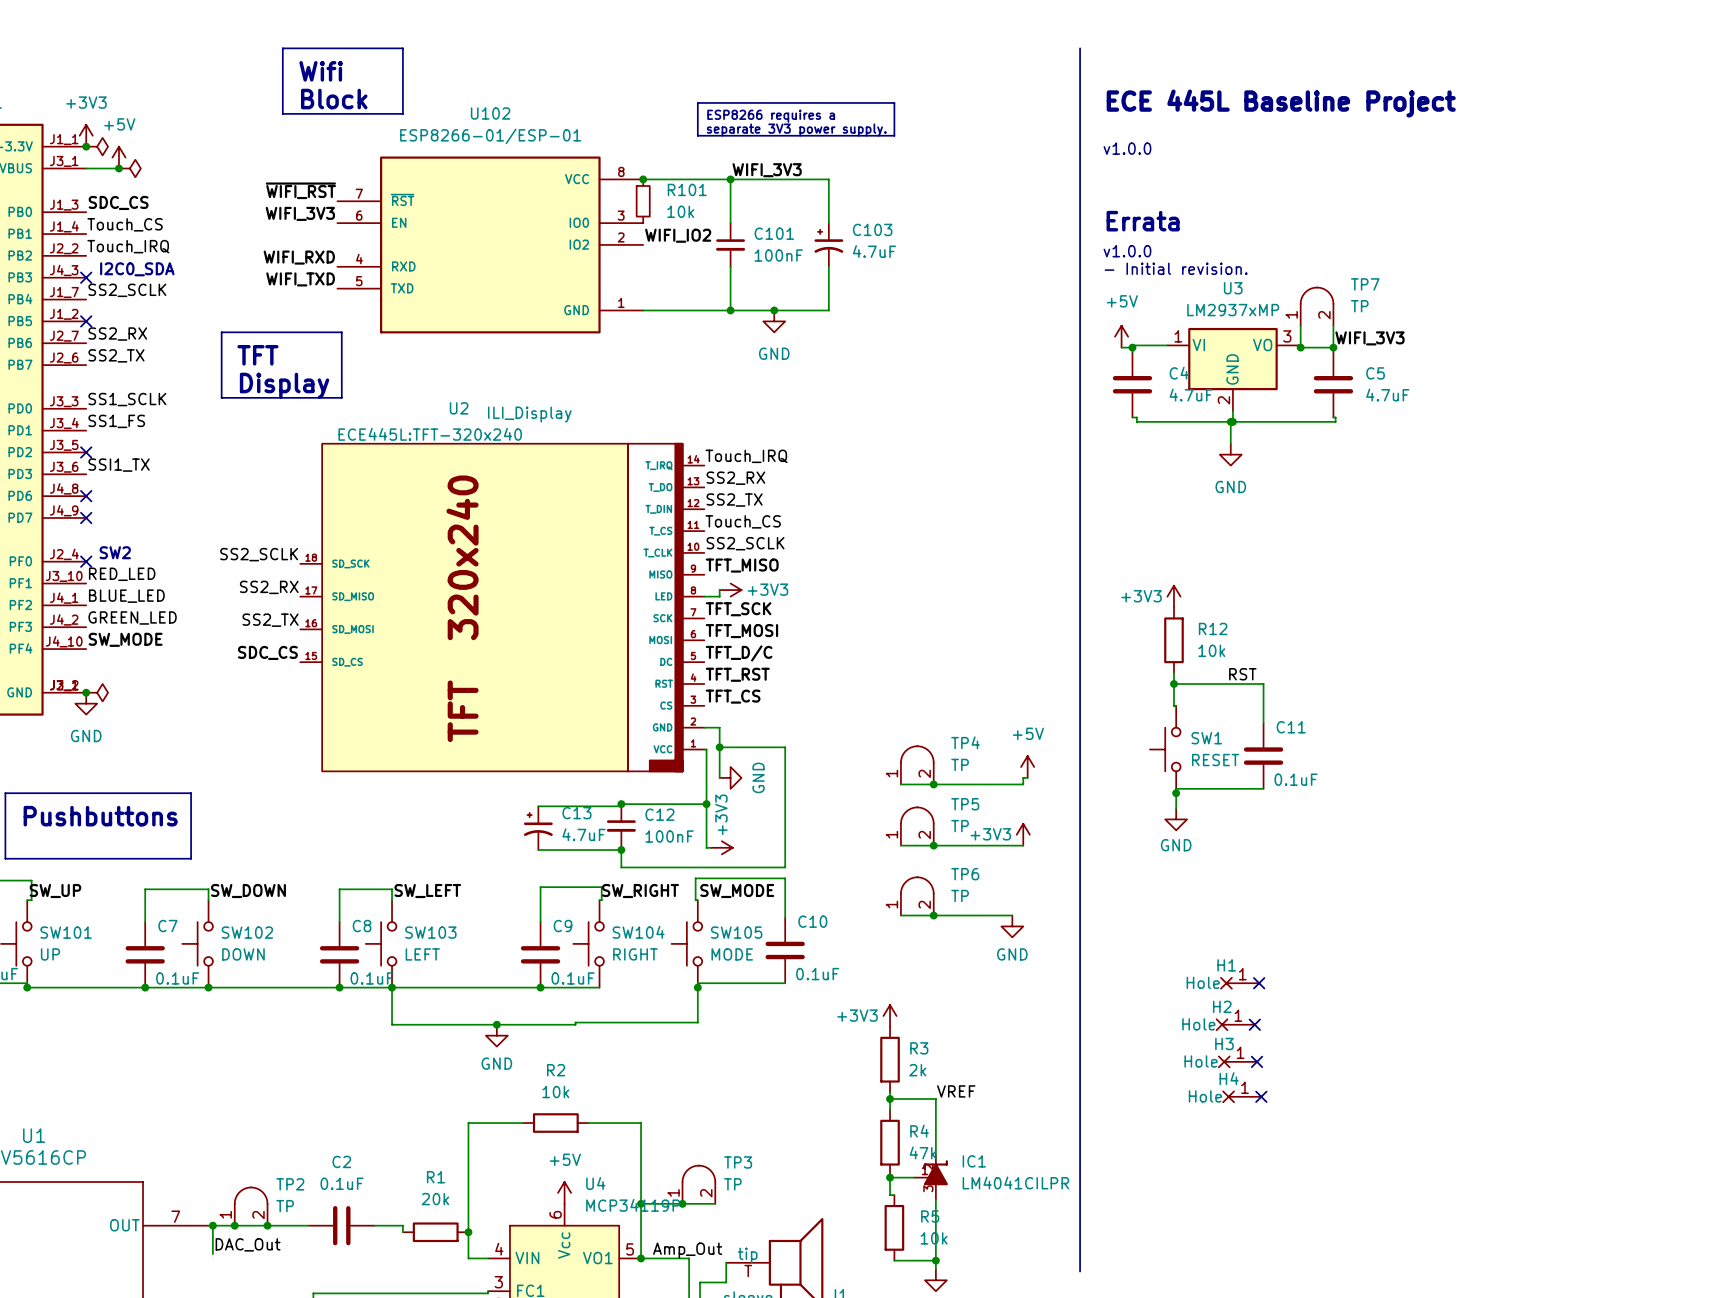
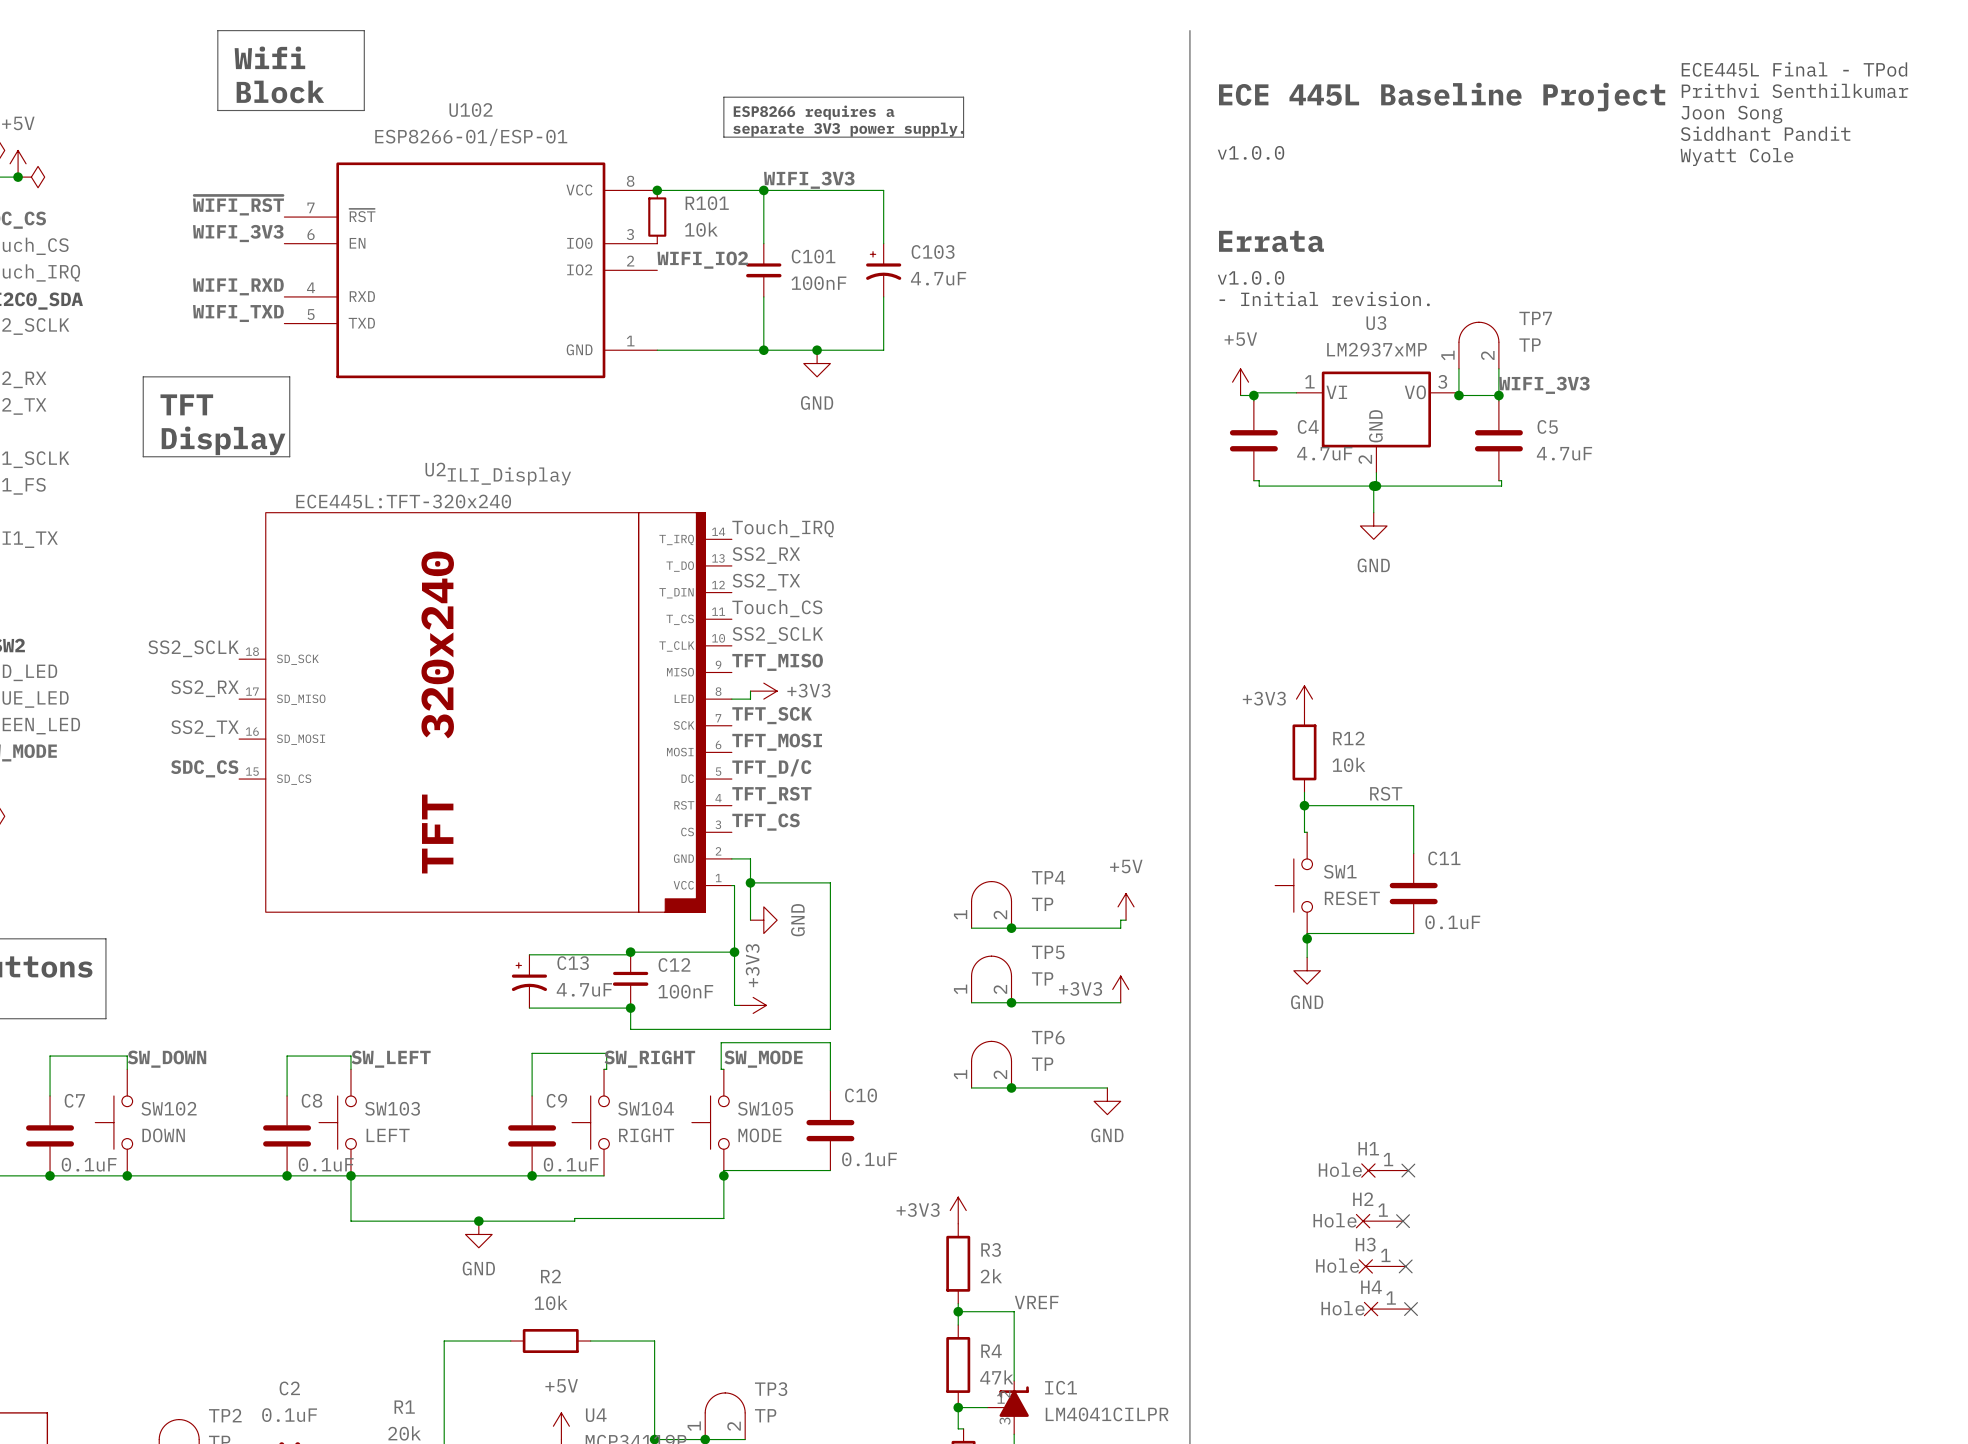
text: none -> ECE445L Final - TPod (1794, 69)
text: none -> Prithvi Senthilkumar (1794, 90)
text: none -> Joon Song (1731, 114)
text: none -> Siddhant Pandit (1765, 133)
text: none -> Wyatt Cole (1736, 157)

